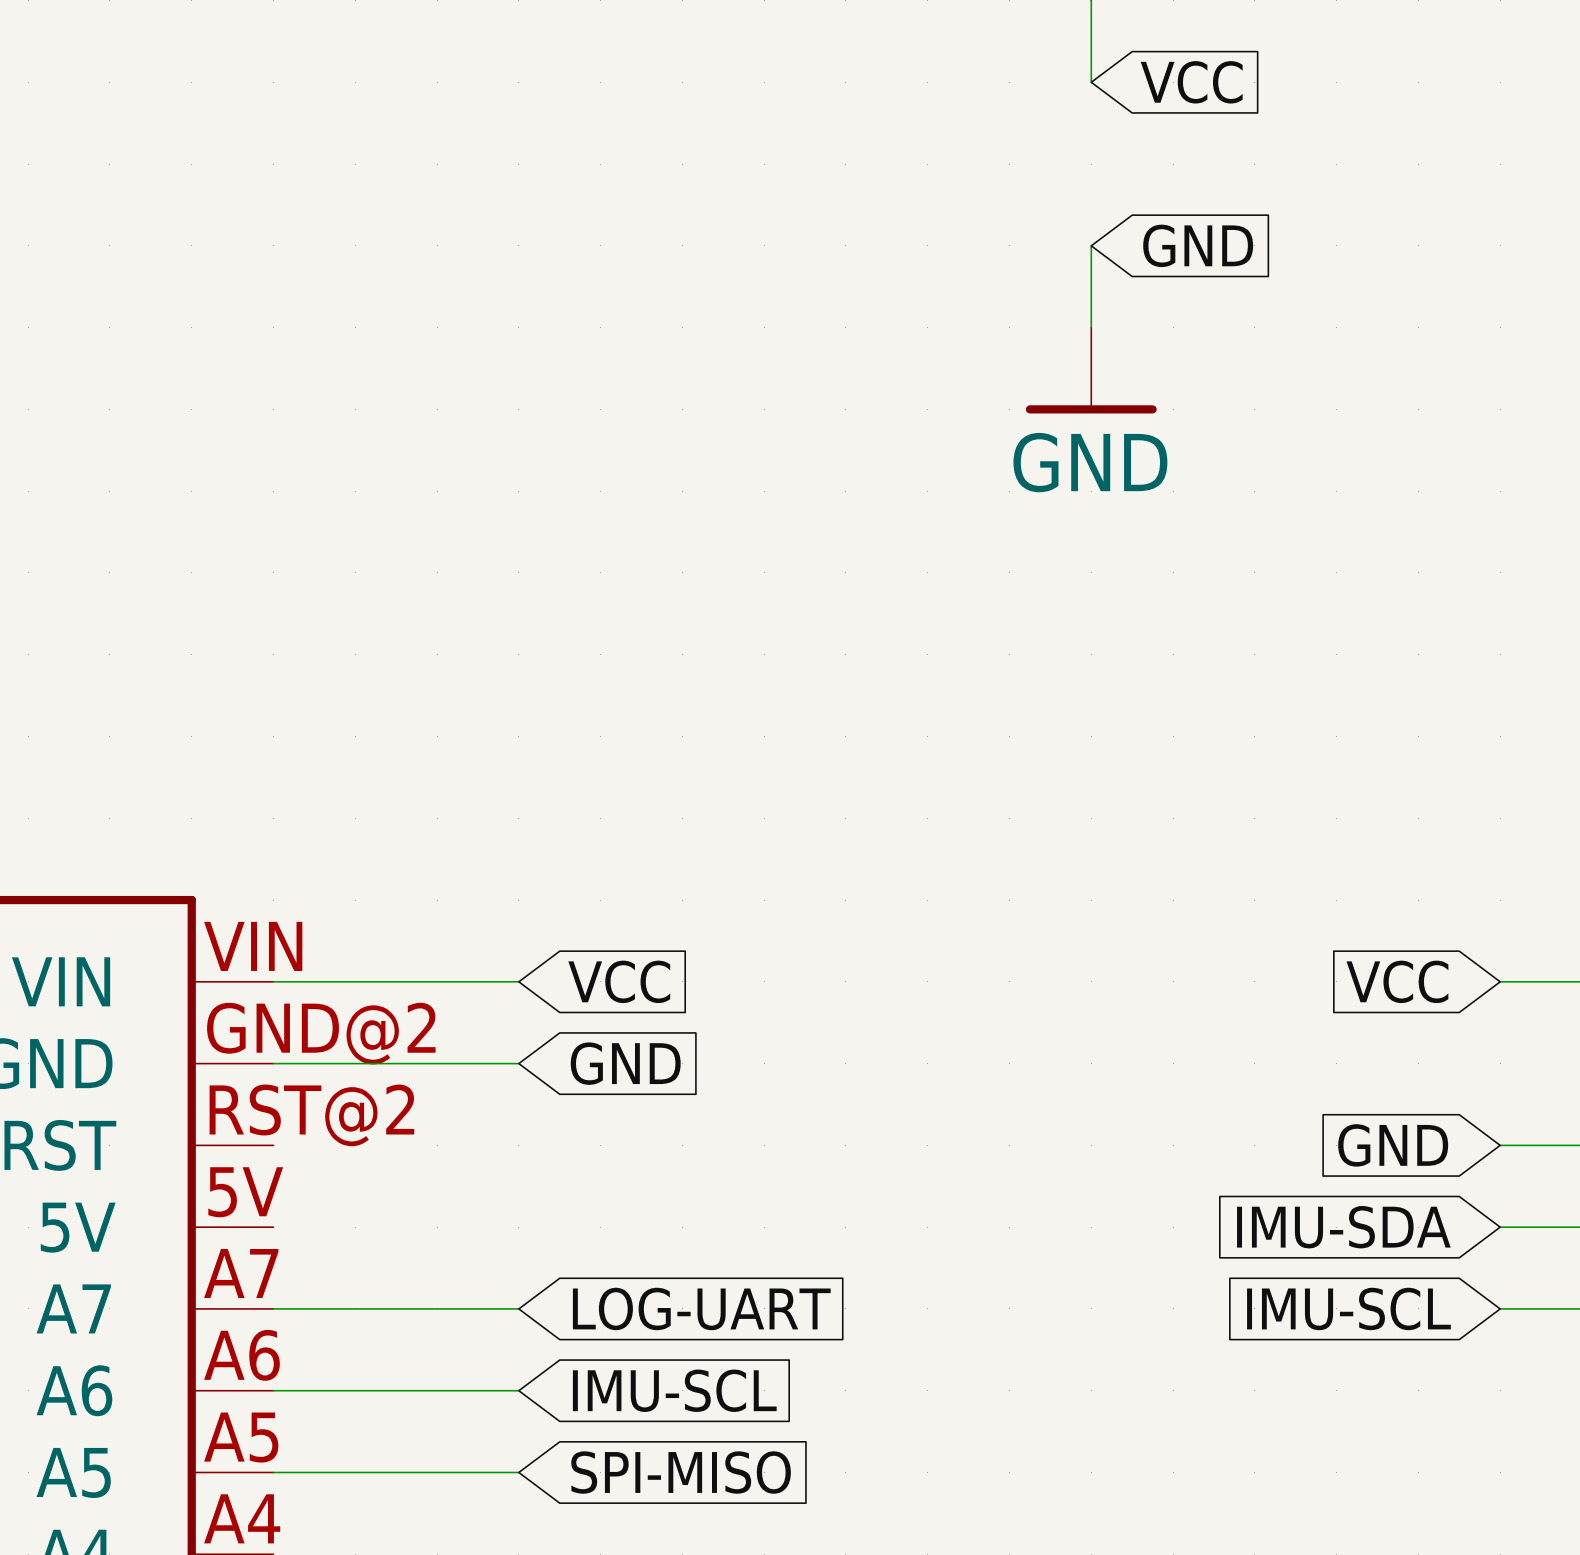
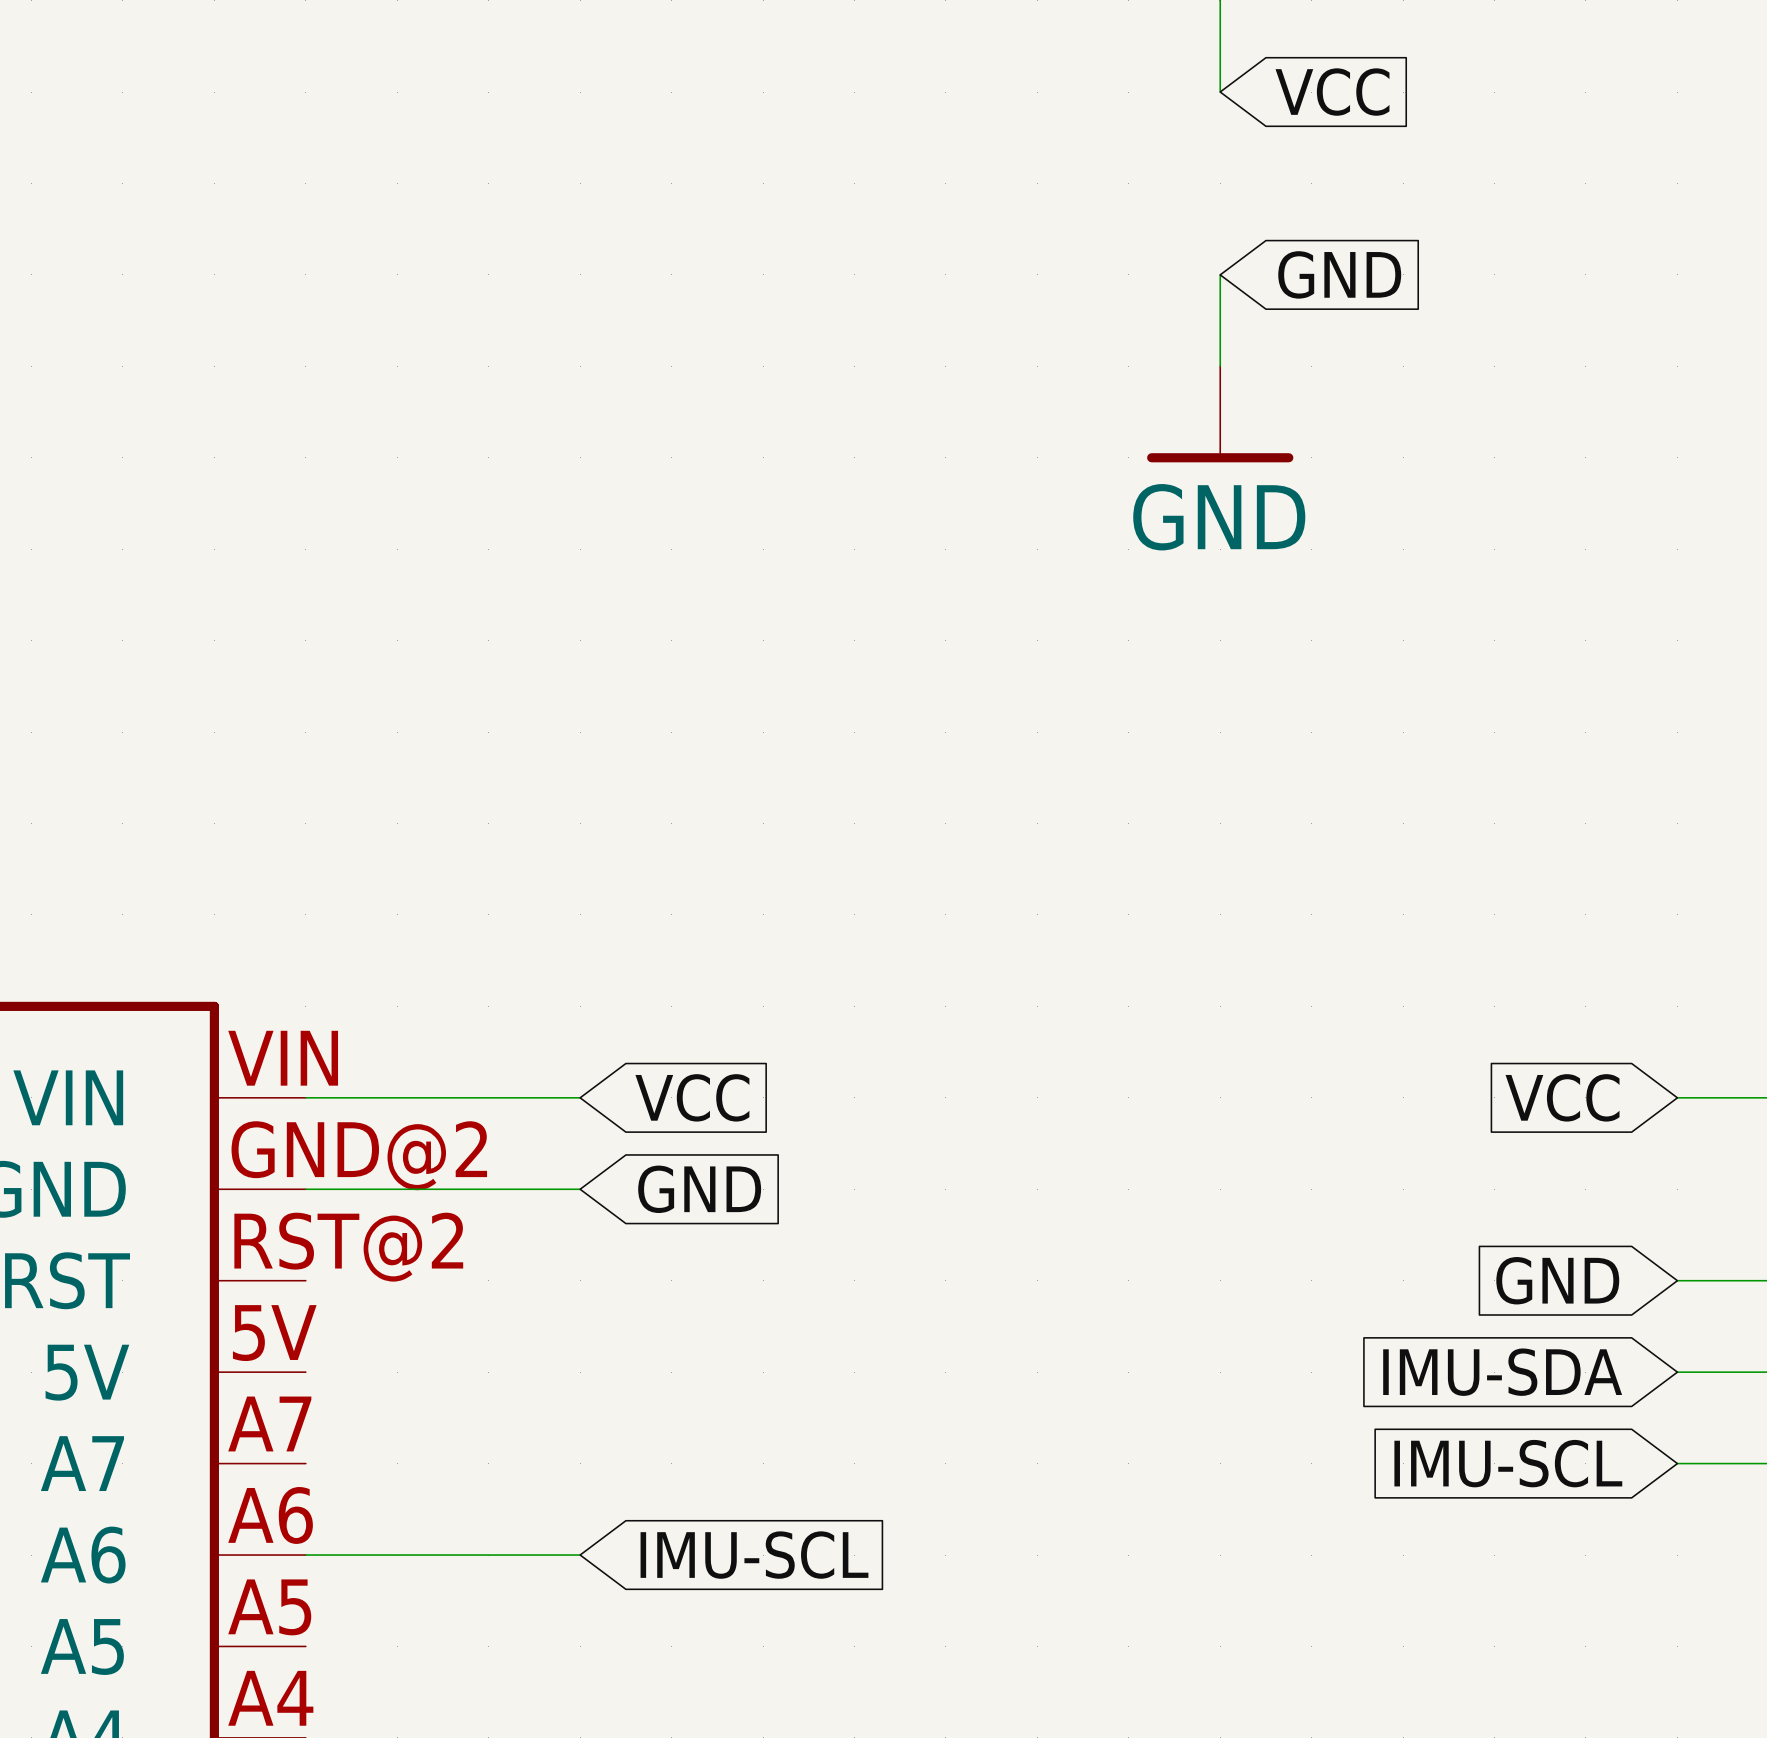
wire: (273, 1308) (518, 1308) -> none
global label: LOG-UART (701, 1308) -> none
wire: (273, 1472) (518, 1472) -> none
global label: SPI-MISO (681, 1472) -> none

